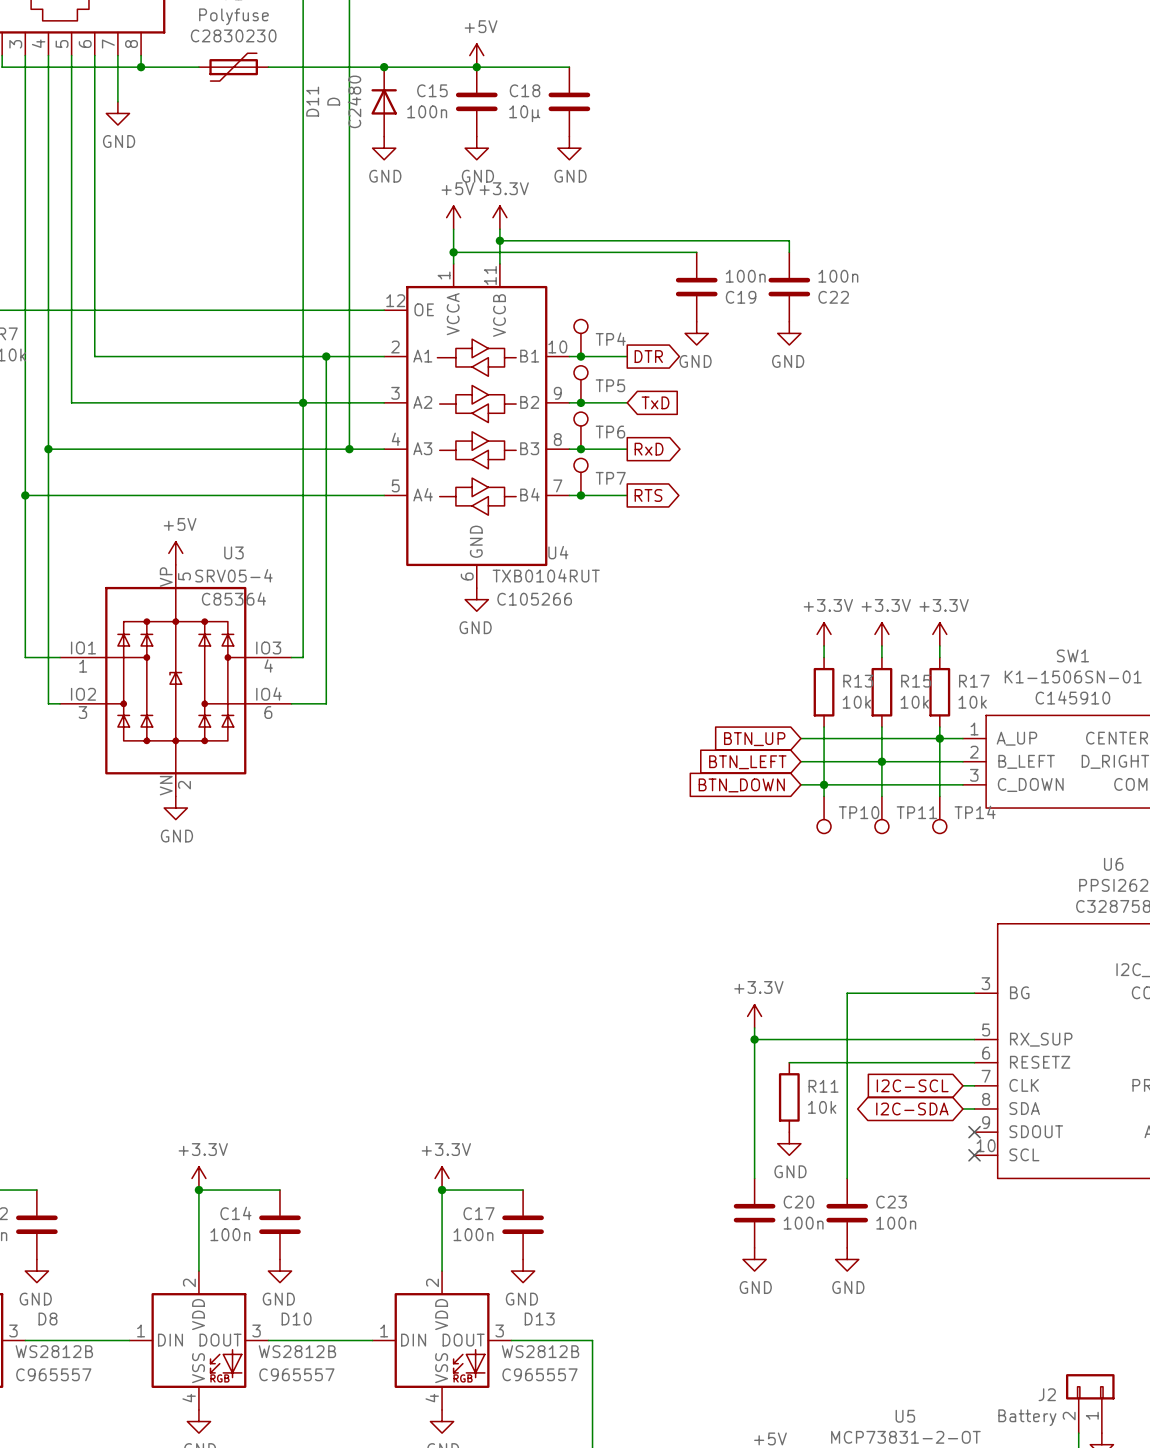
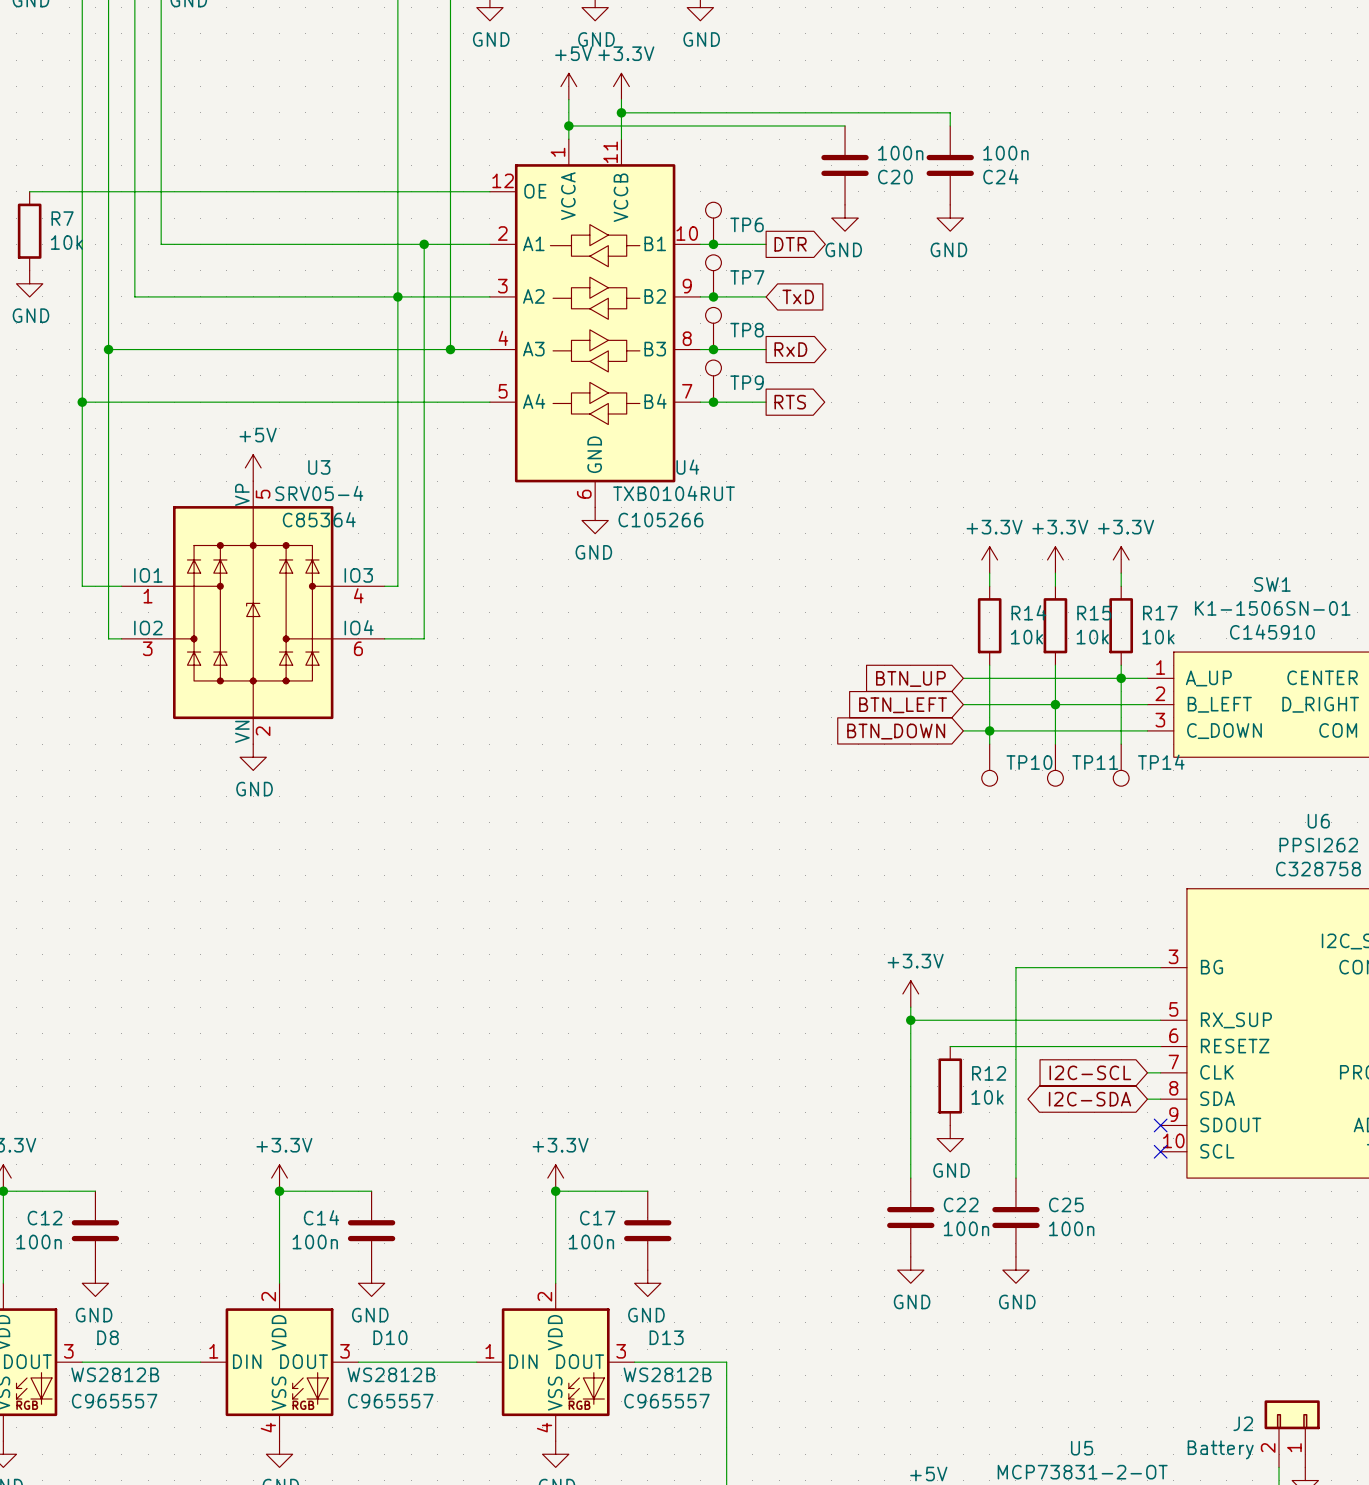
C19 name: C19 (741, 297) -> C20 (895, 177)
C22 name: C22 (833, 297) -> C24 (1000, 176)
TP4 name: TP4 (610, 339) -> TP6 (747, 224)
TP5 name: TP5 (610, 385) -> TP7 (747, 277)
TP6 name: TP6 (610, 432) -> TP8 (747, 330)
TP7 name: TP7 (610, 478) -> TP9 (747, 382)
R13 name: R13 (858, 681) -> R14 (1028, 612)
R11 name: R11 (823, 1086) -> R12 (989, 1073)
C20 name: C20 (798, 1202) -> C22 (961, 1204)
C23 name: C23 (891, 1202) -> C25 (1066, 1204)

